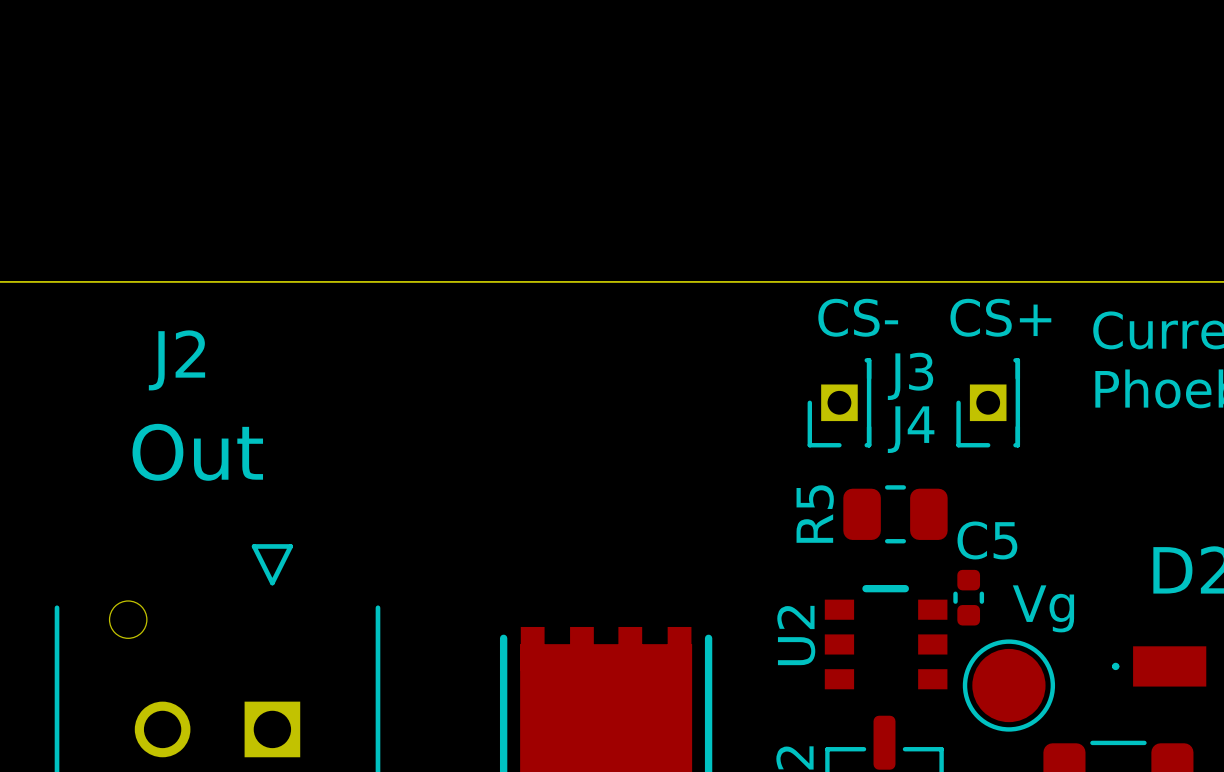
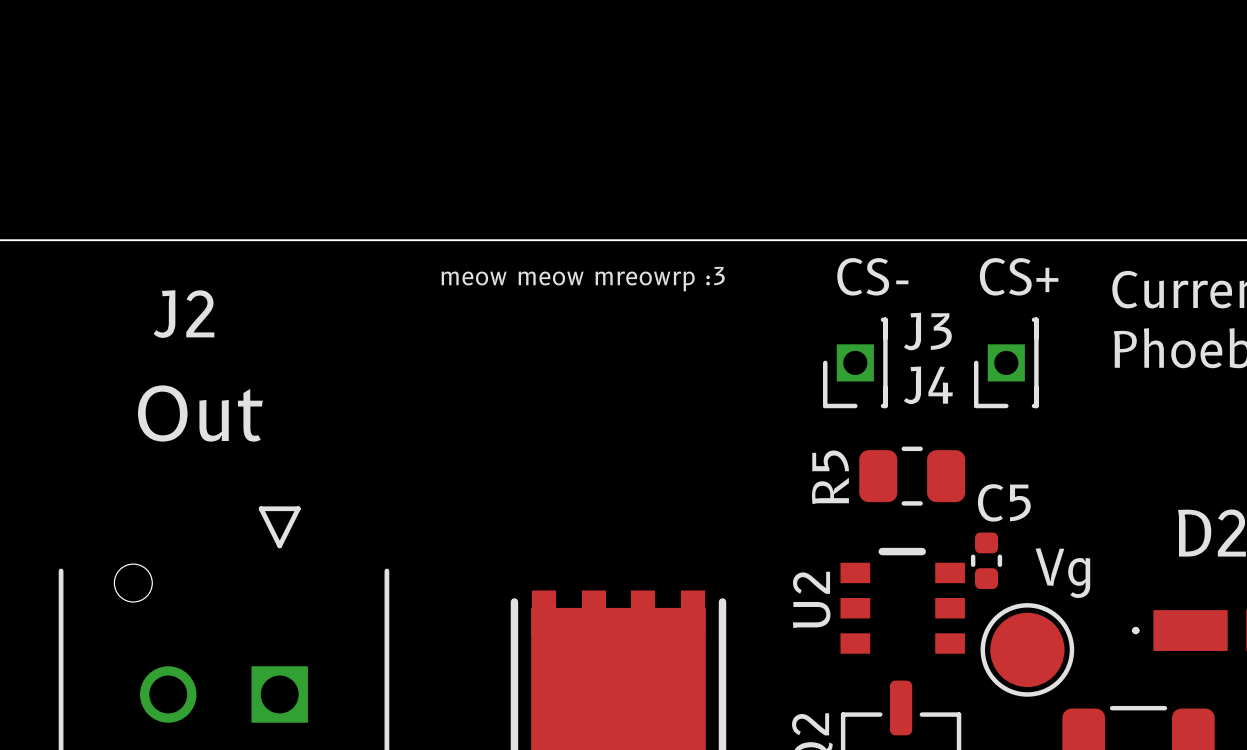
text: none -> meow meow mreowrp :3 (583, 279)

